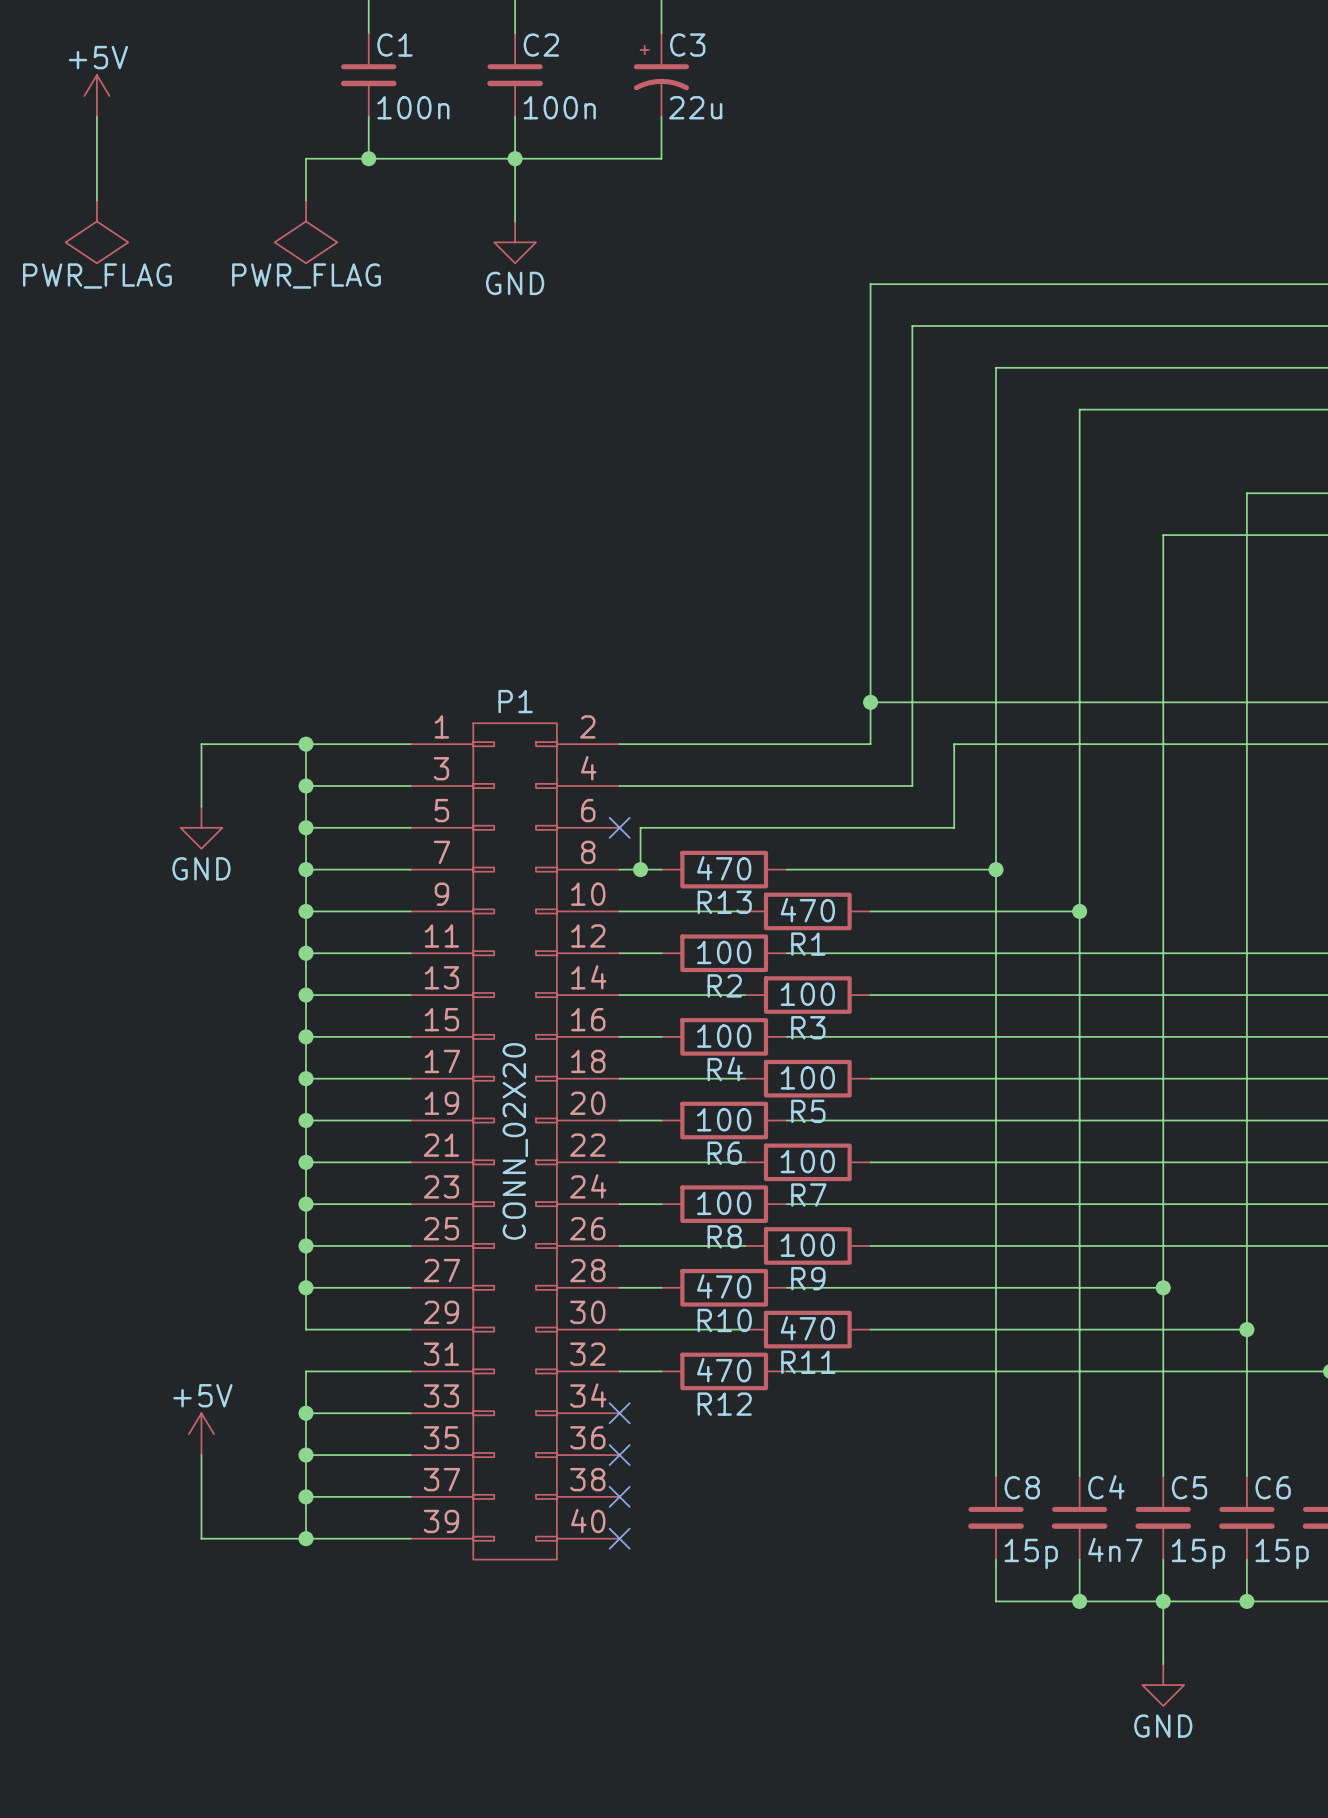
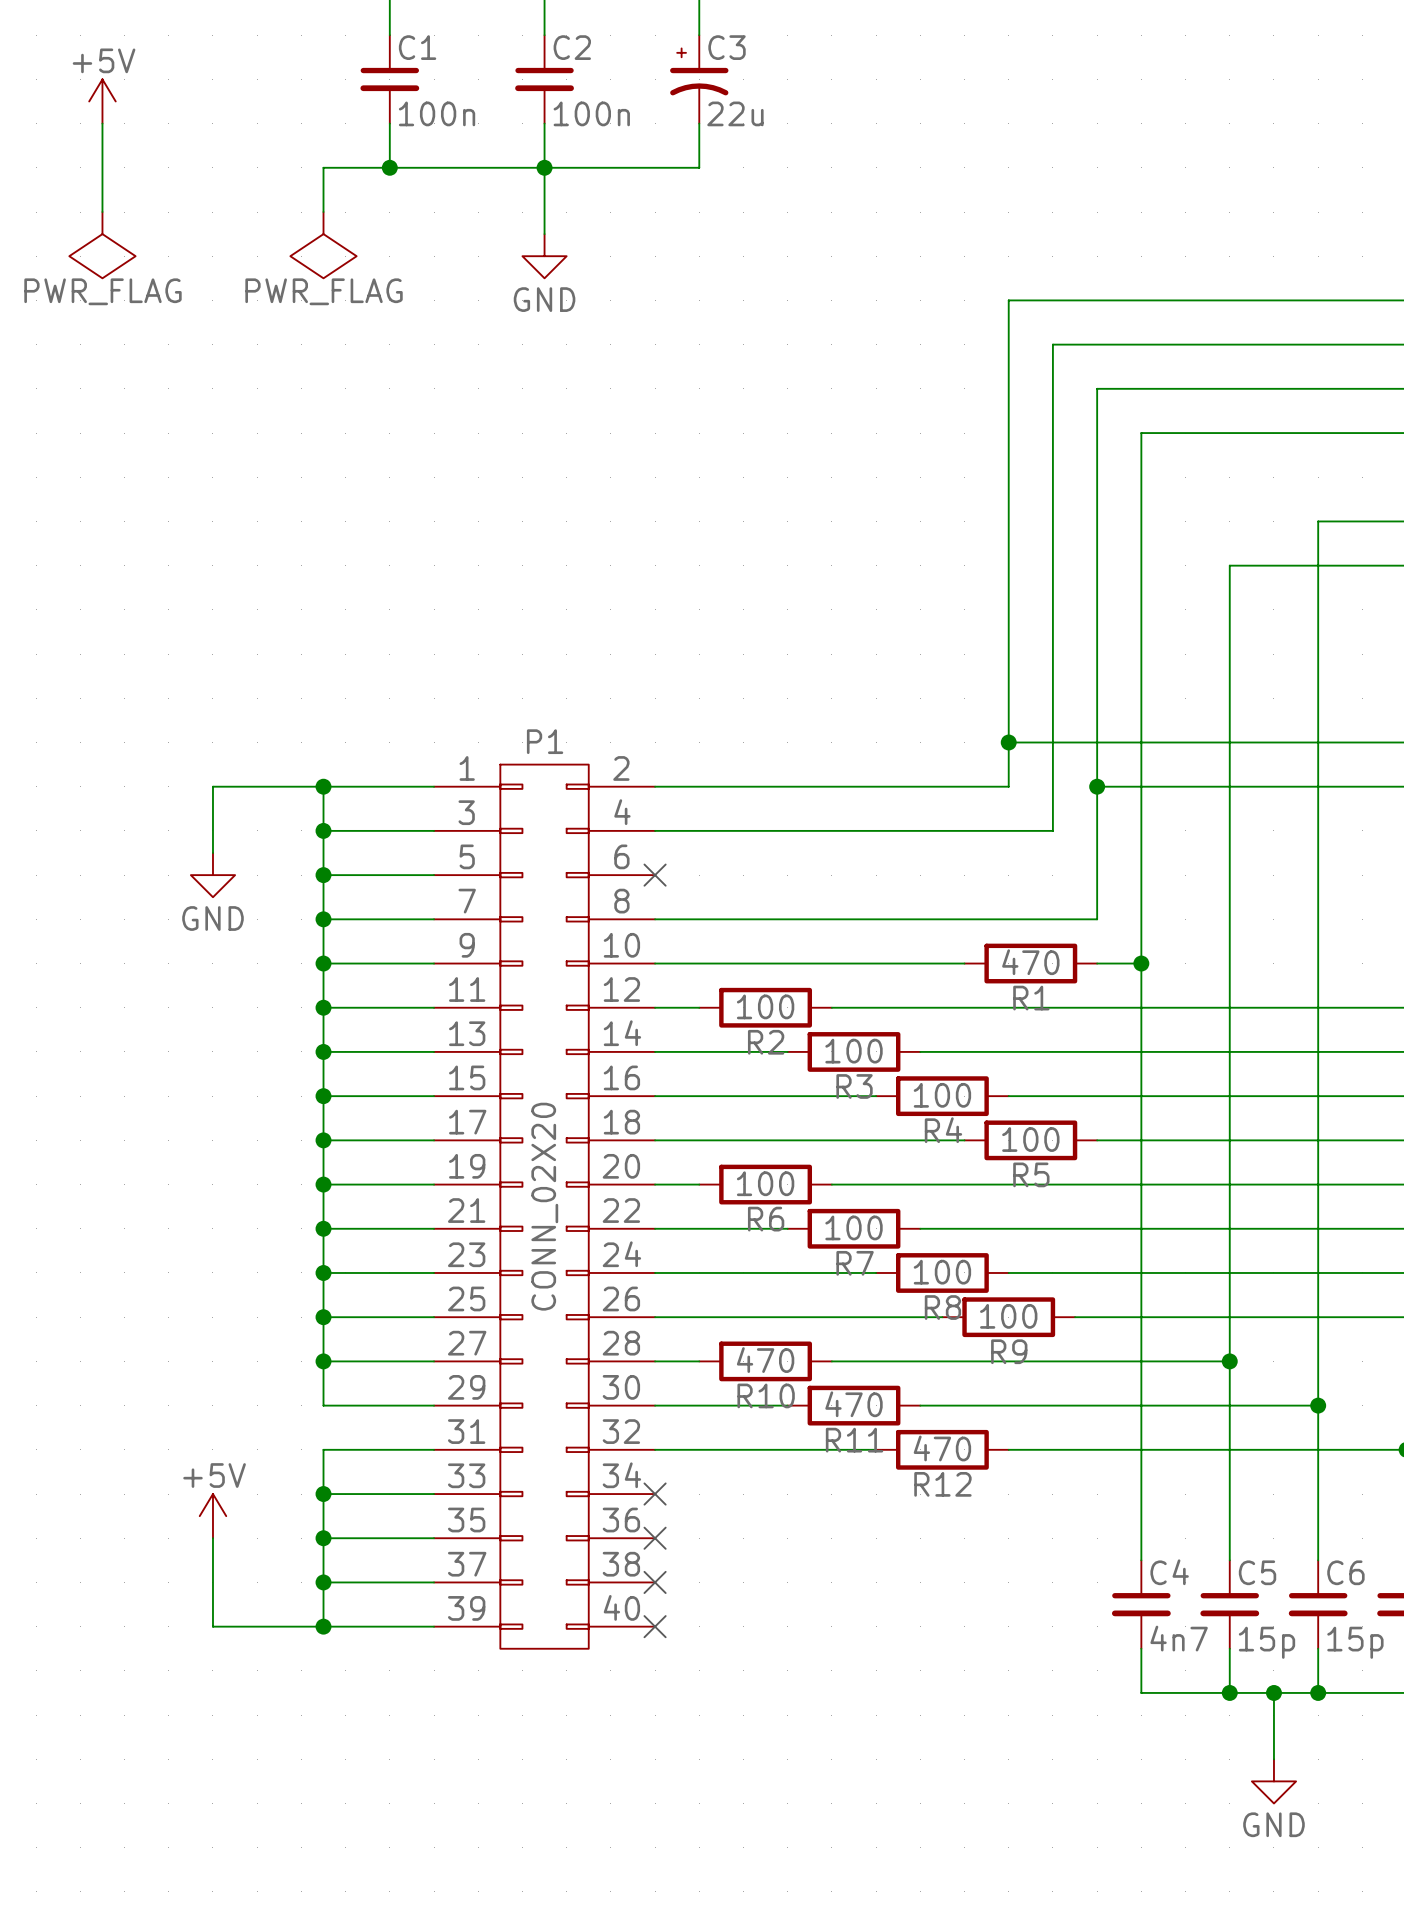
wire: (954, 284) (870, 284) (870, 744) -> (1008, 300) (1008, 786) (920, 786)
wire: (996, 325) (912, 325) (912, 785) -> (1052, 830) (964, 830)
wire: (996, 367) (1037, 367) -> (1052, 388) (1052, 344)
wire: none -> (1097, 388) (1097, 919) (1052, 919)
wire: (870, 702) (954, 702) -> none
junction position: (870, 702) -> (1008, 742)
wire: (1037, 744) (954, 744) (954, 827) (640, 827) (640, 869) -> none
junction: none -> (1097, 786)
wire: (996, 785) (996, 1475) -> none
junction: (640, 869) -> none
wire: none -> (699, 919) (831, 919)
R13: 470 (724, 869) -> none
junction: (996, 869) -> none
R1 position: (807, 911) -> (1030, 963)
wire: (912, 911) (1037, 911) -> (787, 963) (920, 963)
R4 position: (724, 1036) -> (942, 1096)
wire: (828, 1036) (954, 1036) -> (699, 1096) (831, 1096)
R5 position: (807, 1078) -> (1030, 1140)
wire: (912, 1078) (1037, 1078) -> (787, 1140) (920, 1140)
R8 position: (724, 1204) -> (942, 1272)
wire: (828, 1204) (954, 1204) -> (699, 1272) (831, 1272)
R9 position: (807, 1245) -> (1008, 1317)
wire: (891, 1245) (1016, 1245) -> (787, 1317) (920, 1317)
R12 position: (724, 1371) -> (942, 1449)
wire: (828, 1371) (954, 1371) -> (699, 1449) (831, 1449)
C8: 15p (996, 1517) -> none
wire: (996, 1559) (996, 1601) (1079, 1601) -> none
junction: (1079, 1601) -> none
wire: (1163, 1601) (1163, 1664) -> (1273, 1692) (1273, 1759)
junction: none -> (1273, 1692)
power symbol position: GND (1163, 1685) -> GND (1273, 1781)

